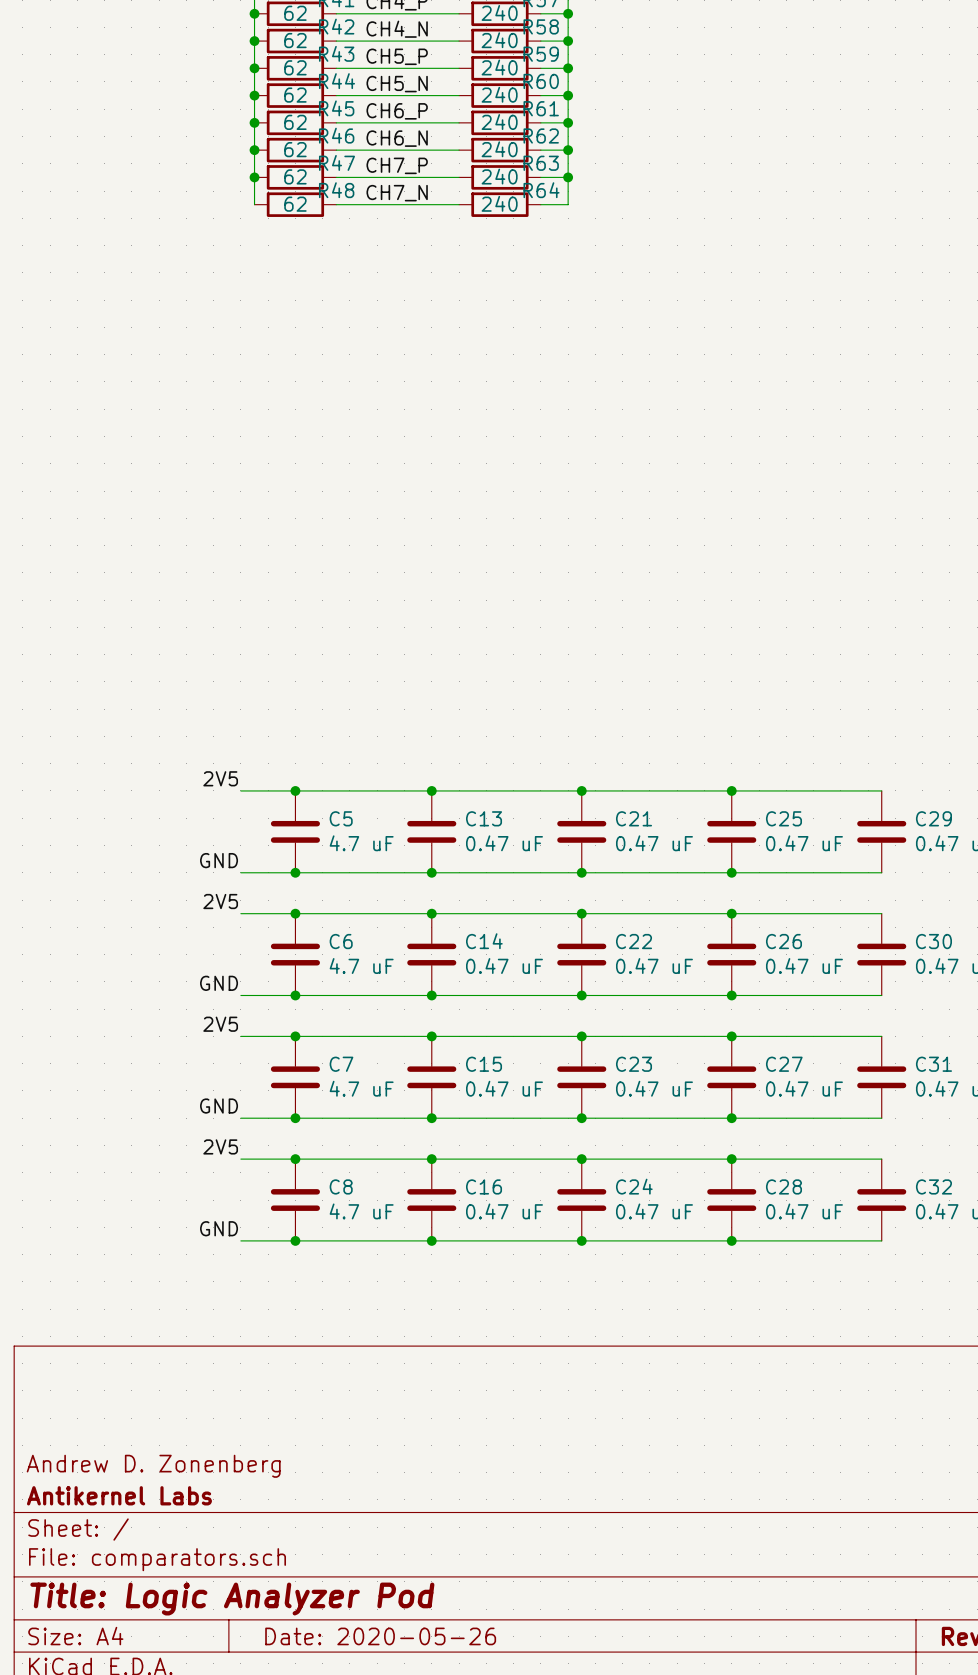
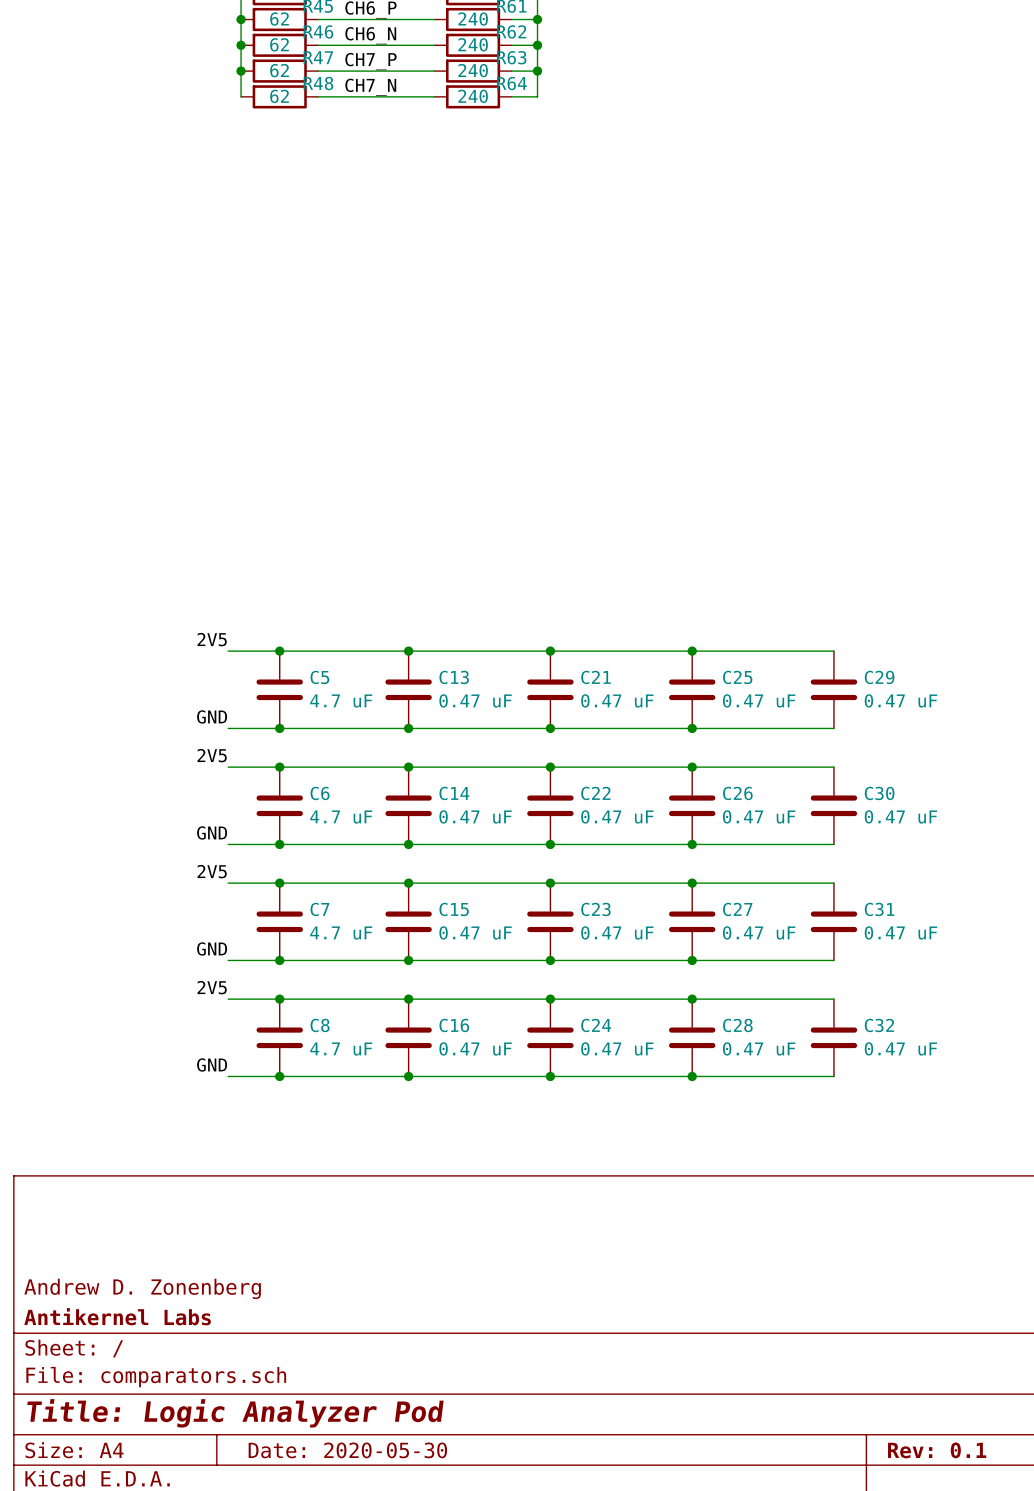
title block: Date: 2020-05-26 (380, 1636) -> Date: 2020-05-30 (347, 1450)

